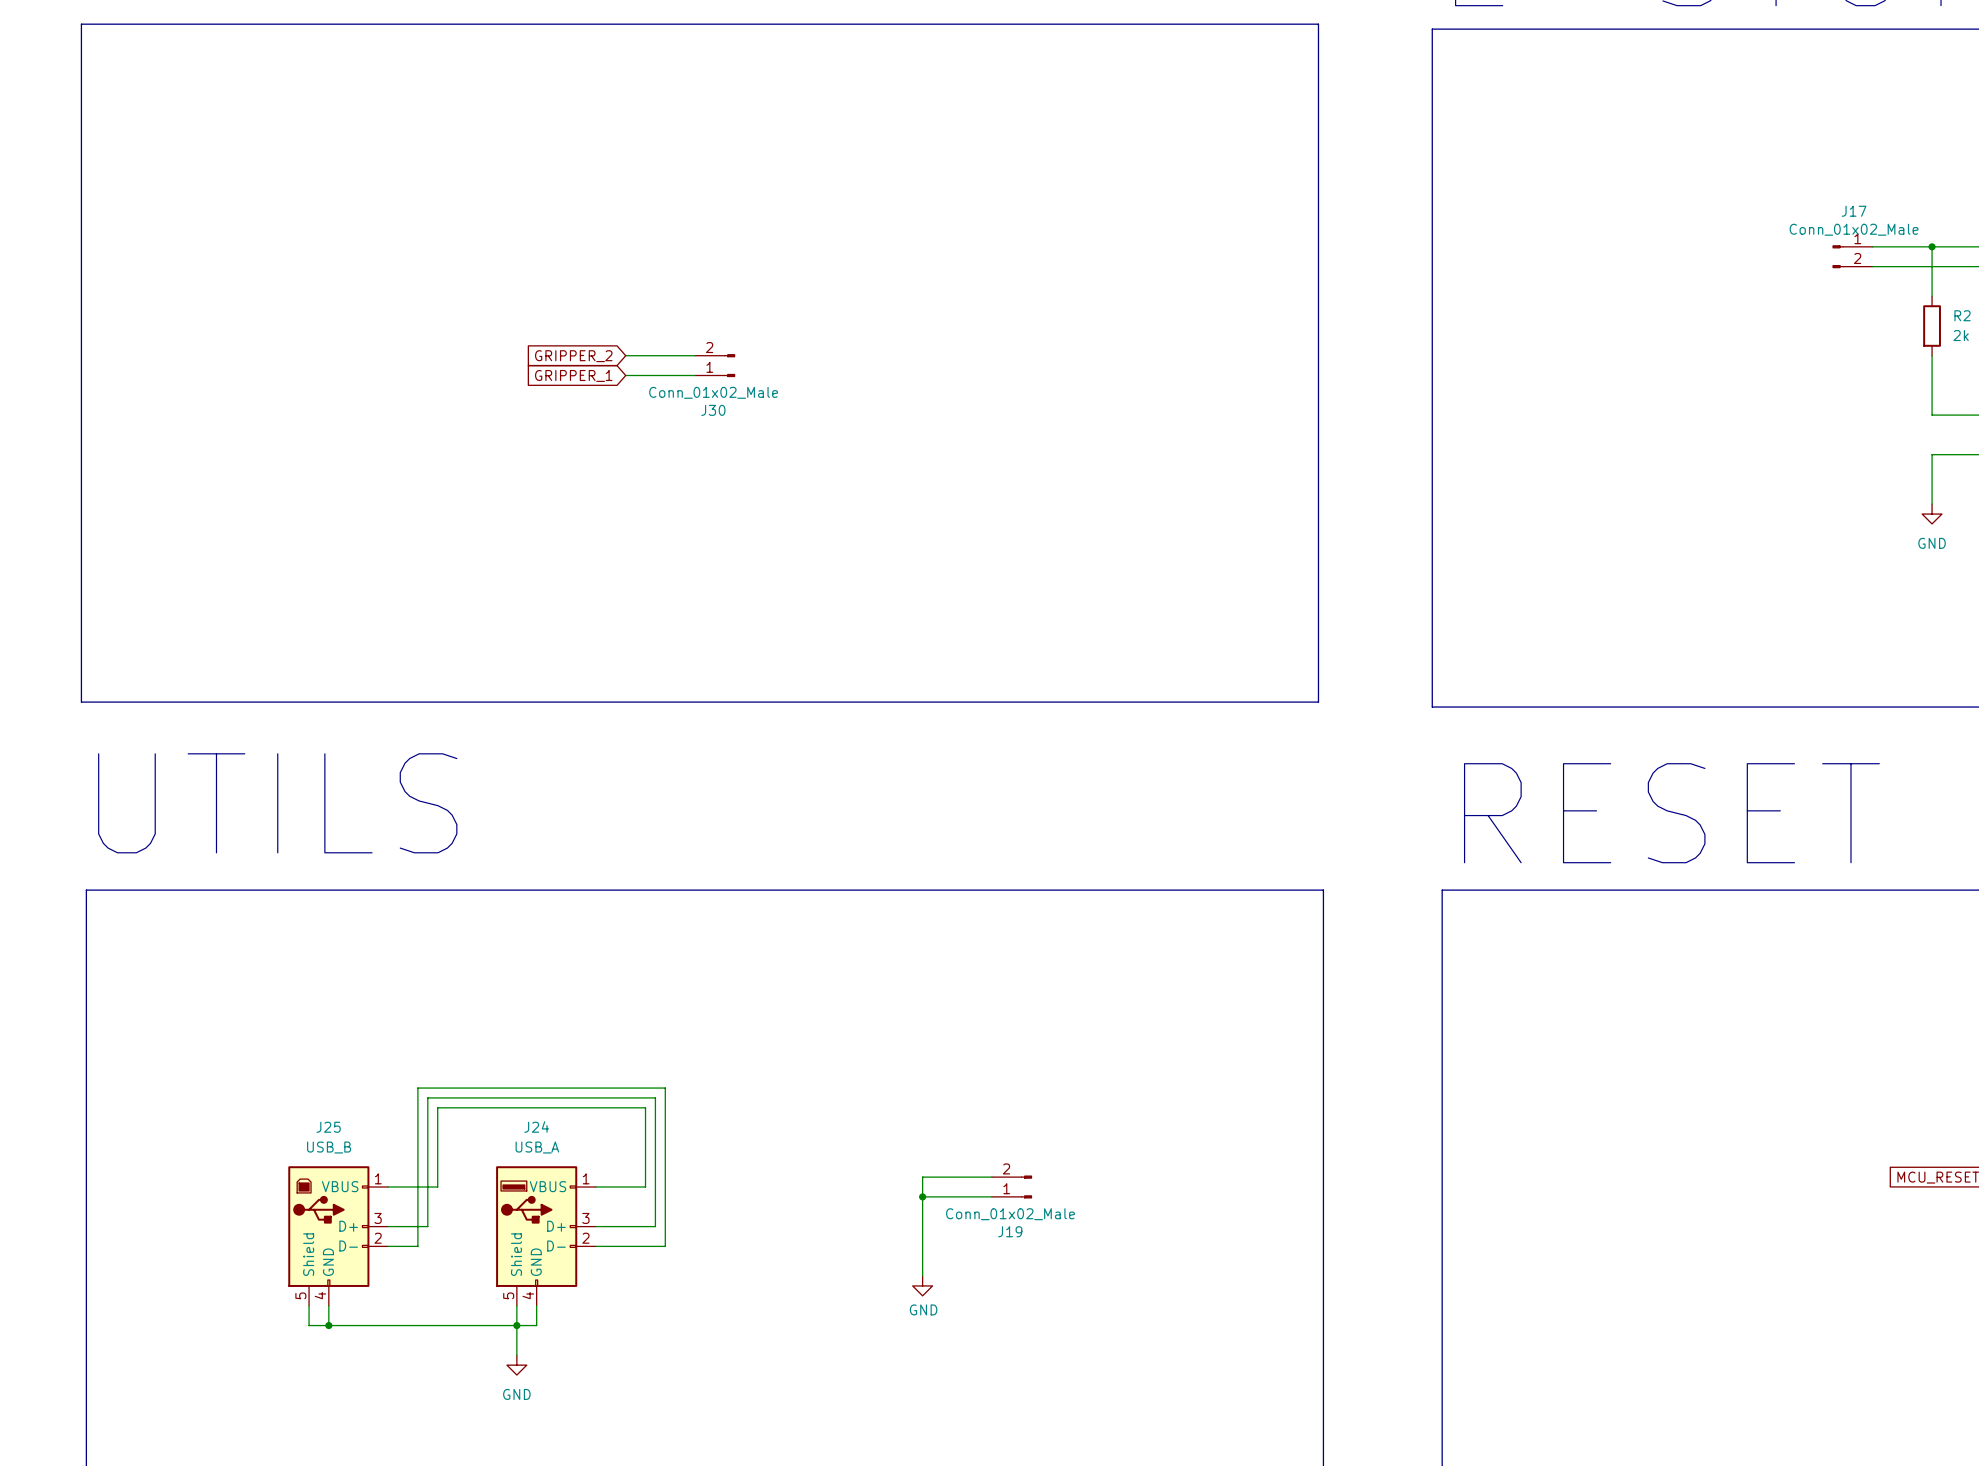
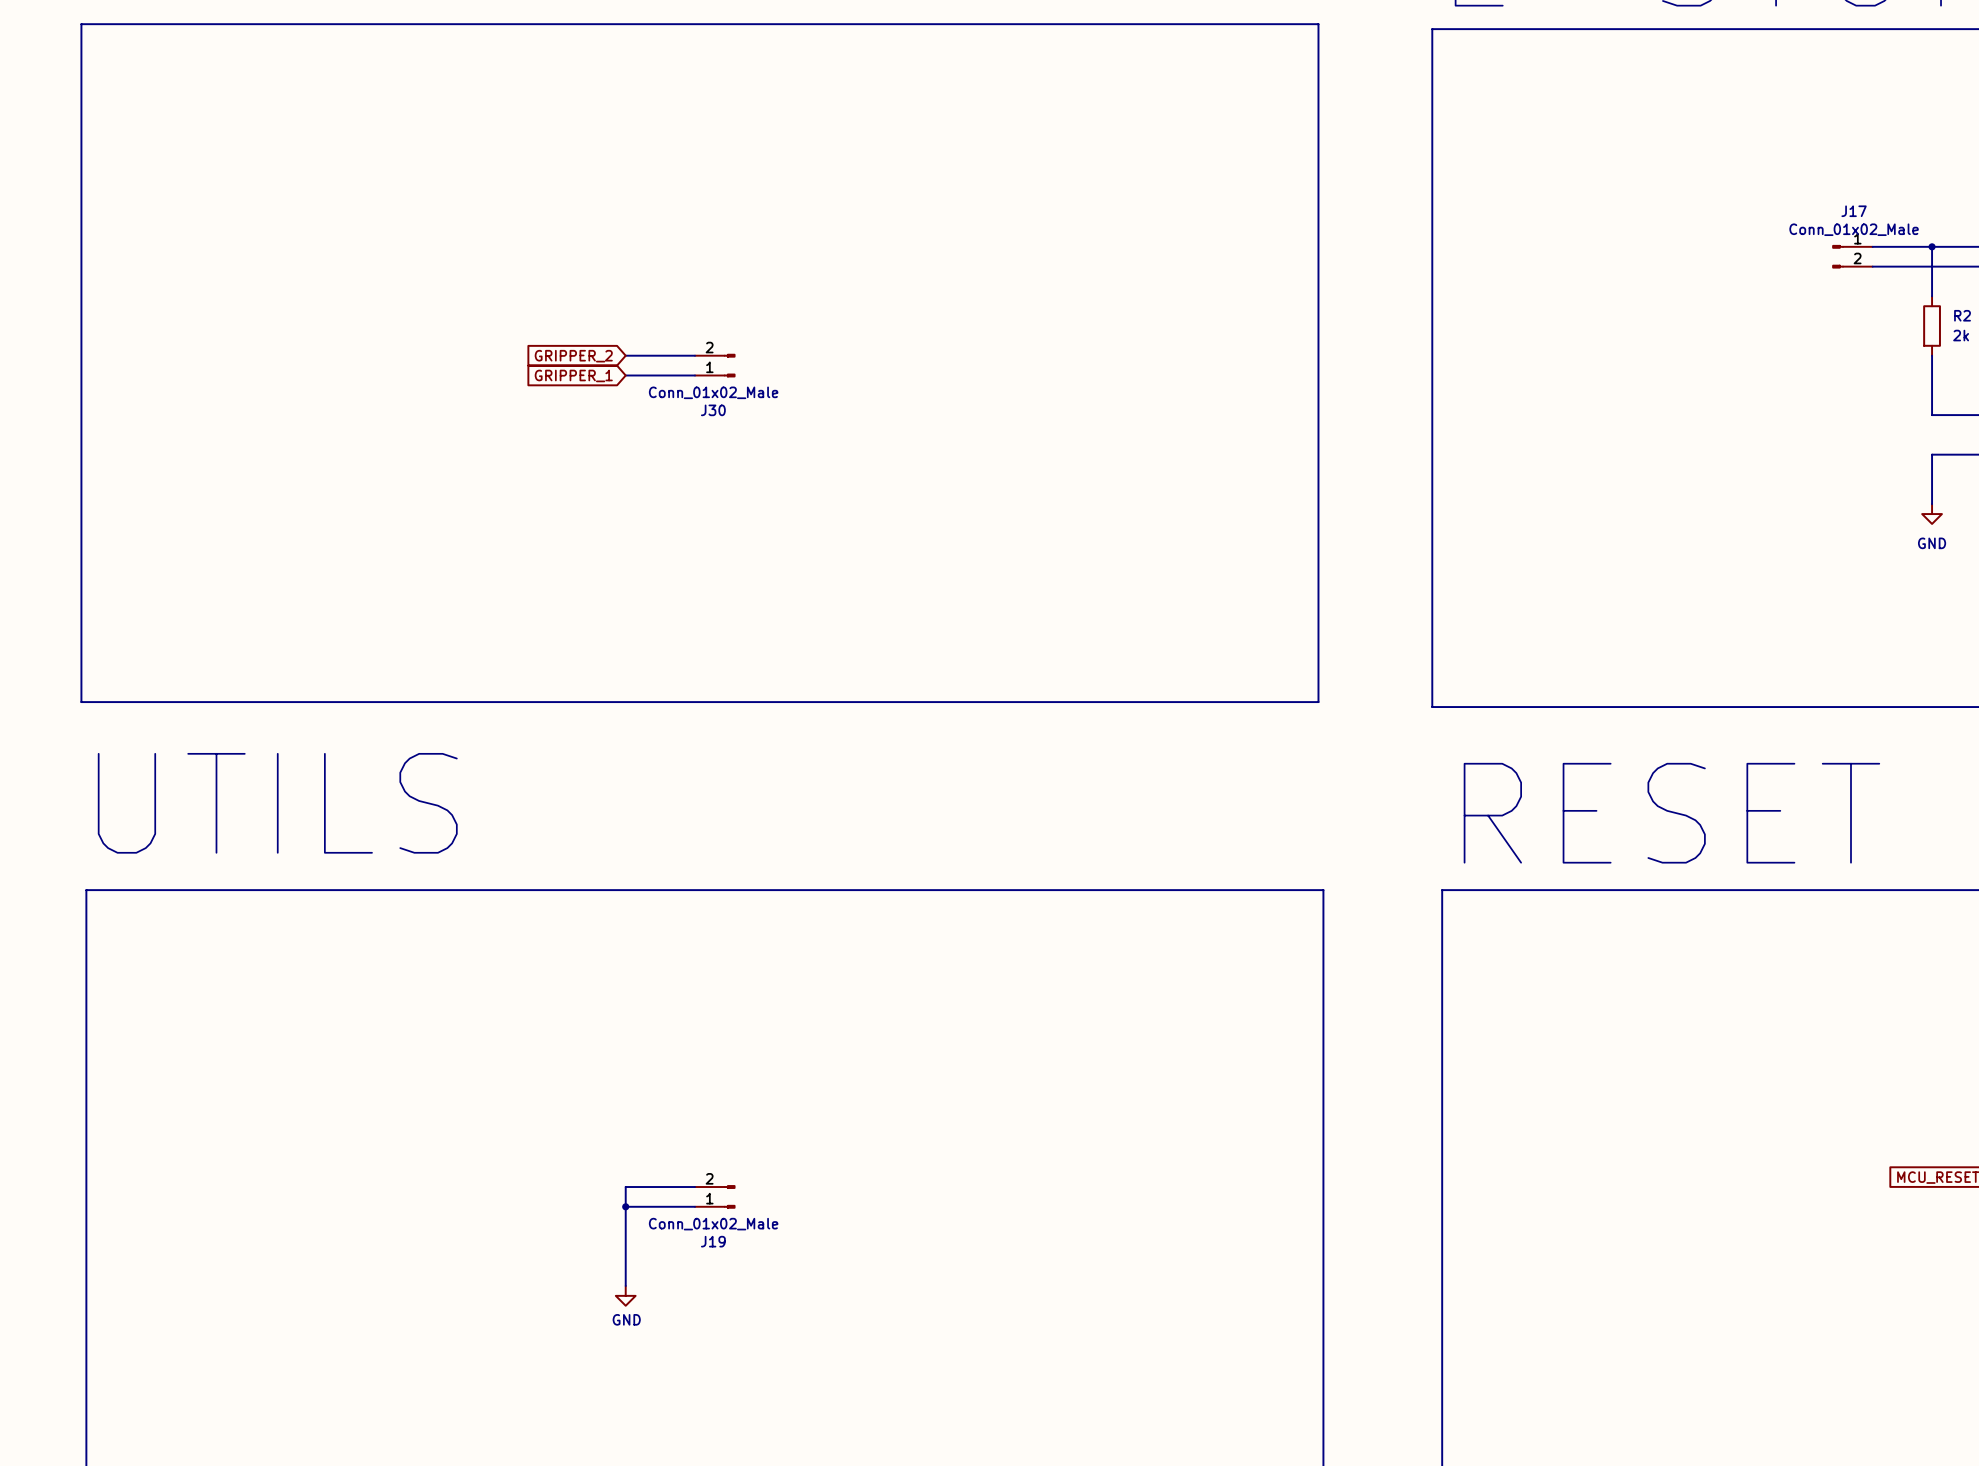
wire: (991, 1177) (922, 1177) (922, 1276) -> none
wire: (388, 1187) (437, 1187) (437, 1107) (645, 1107) (645, 1187) -> (695, 1187) (645, 1187)
wire: (596, 1187) (625, 1187) -> (625, 1285) (625, 1187)
J19 position: (1011, 1187) -> (715, 1196)
wire: (922, 1196) (991, 1196) -> none
junction: (922, 1196) -> none
wire: none -> (625, 1206) (695, 1206)
junction: none -> (625, 1206)
wire: (388, 1226) (427, 1226) (427, 1097) (655, 1097) (655, 1226) (596, 1226) -> none
J25: USB_B (338, 1235) -> none
J24: USB_A (546, 1235) -> none
wire: (388, 1246) (417, 1246) (417, 1088) (665, 1088) (665, 1246) (596, 1246) -> none
power symbol: GND (922, 1285) -> none
wire: (309, 1305) (309, 1325) (536, 1325) (536, 1305) -> none
wire: (328, 1305) (328, 1325) -> none
wire: (516, 1305) (516, 1355) -> none
junction: (328, 1325) -> none
junction: (516, 1325) -> none
power symbol position: GND (516, 1365) -> GND (625, 1295)
power symbol text position: GND (516, 1394) -> GND (626, 1319)

